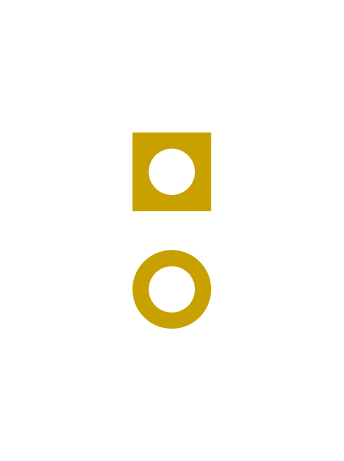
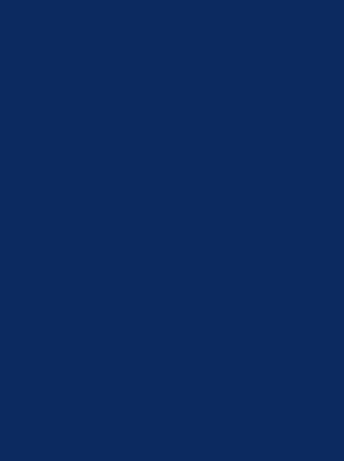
part: (171, 230) -> none

